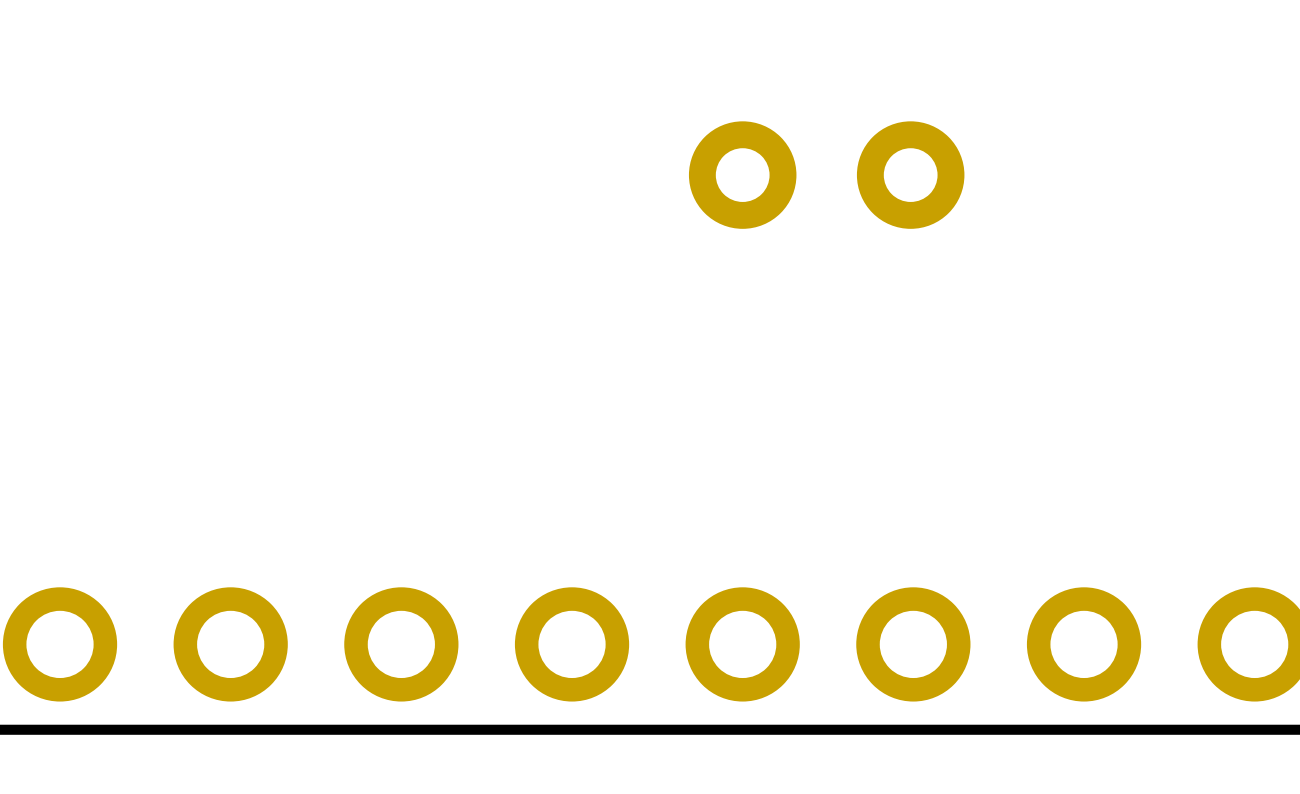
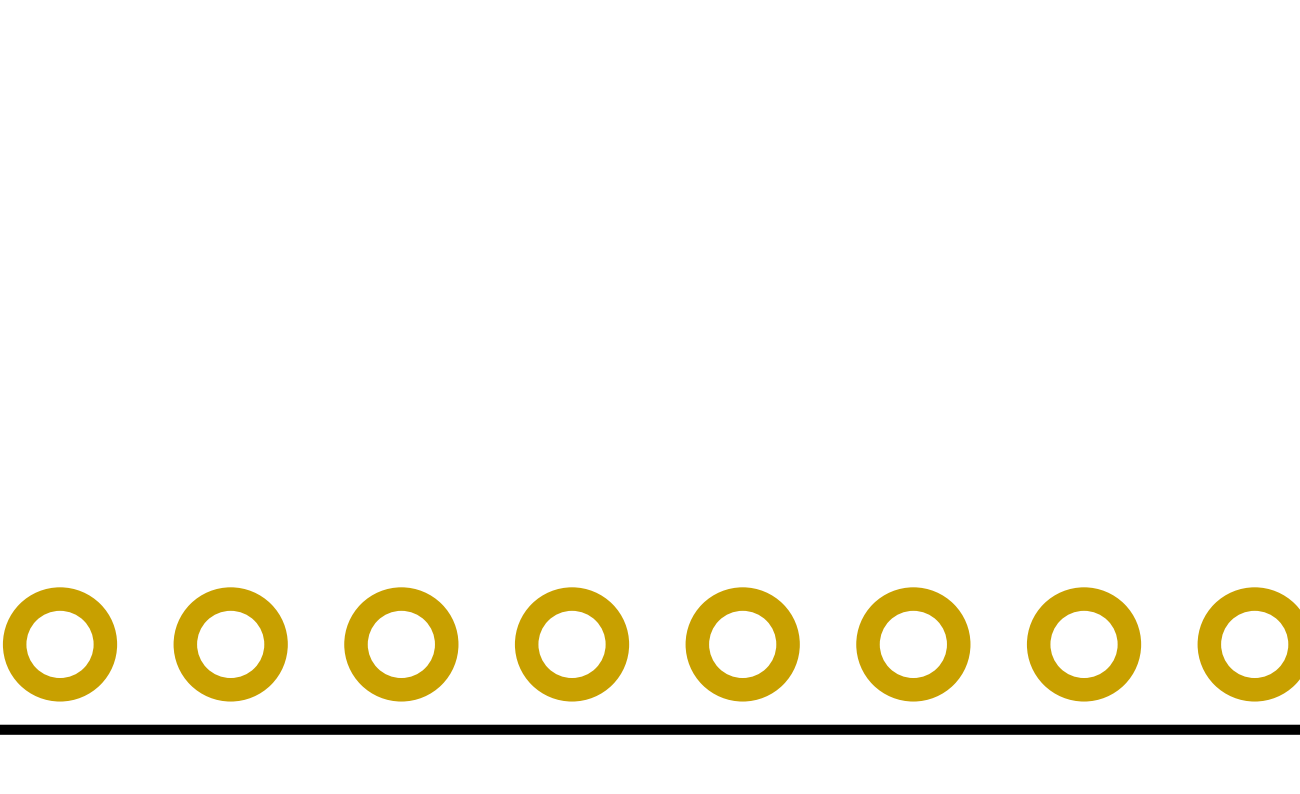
part: (826, 175) -> none

